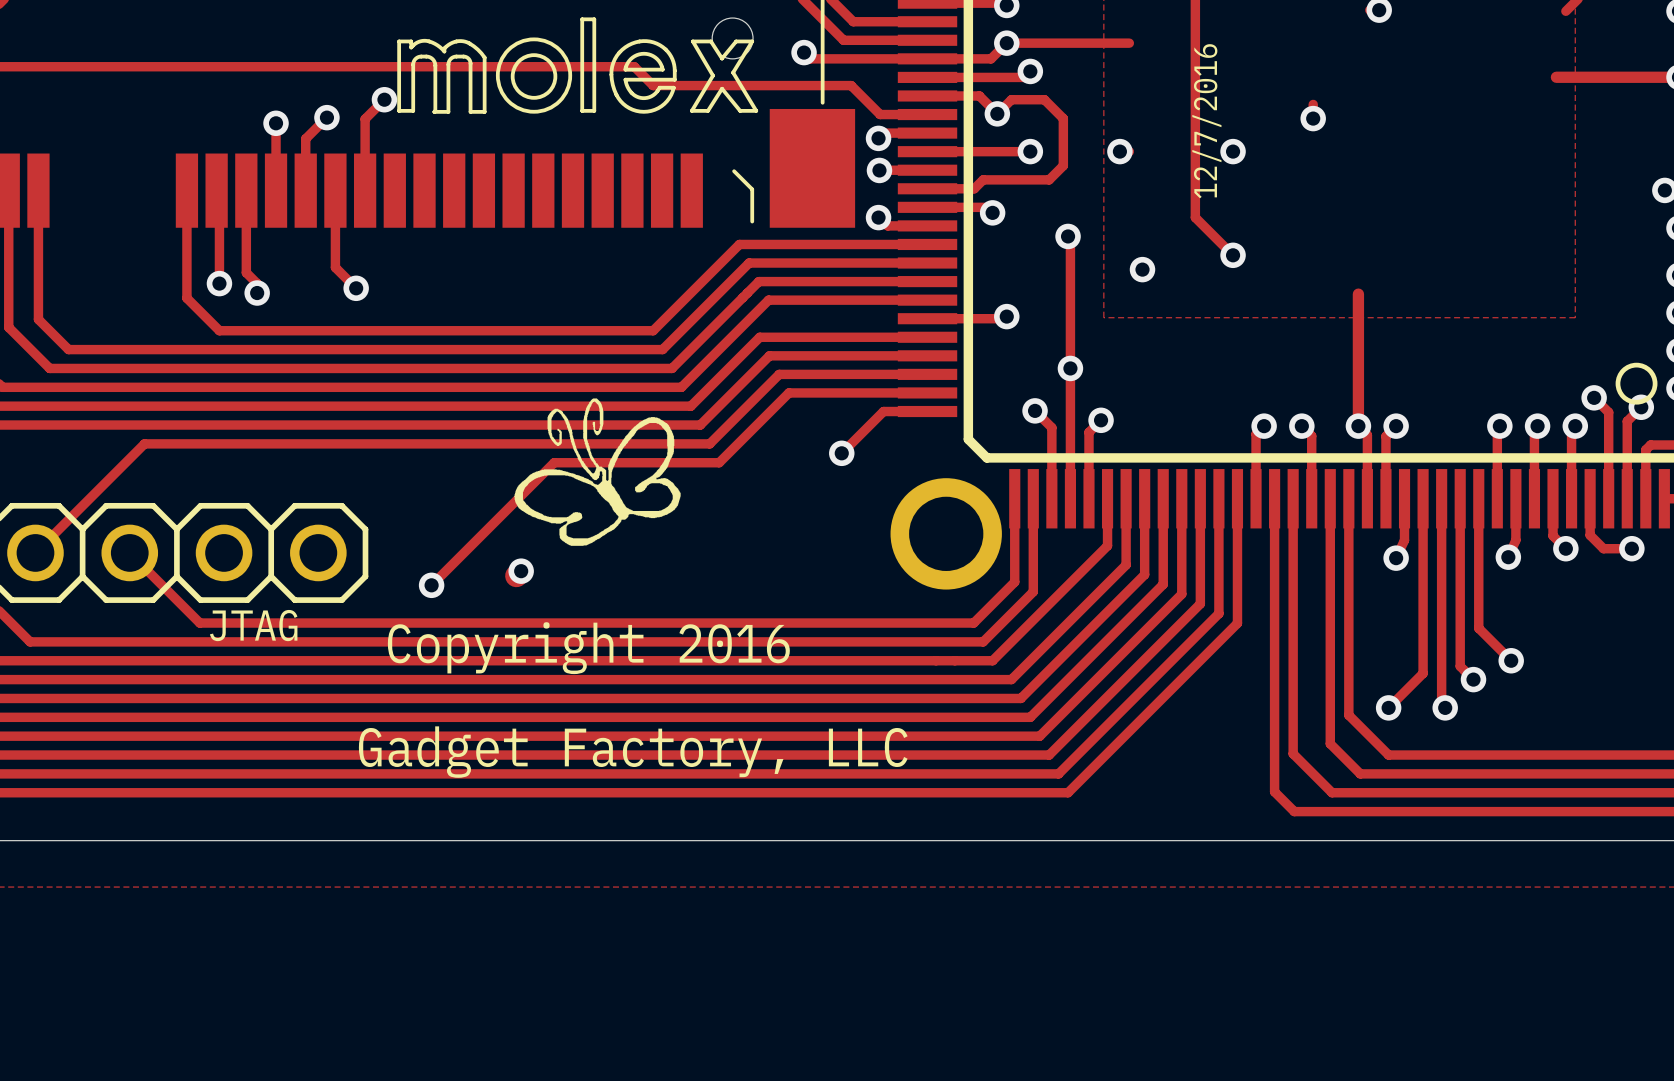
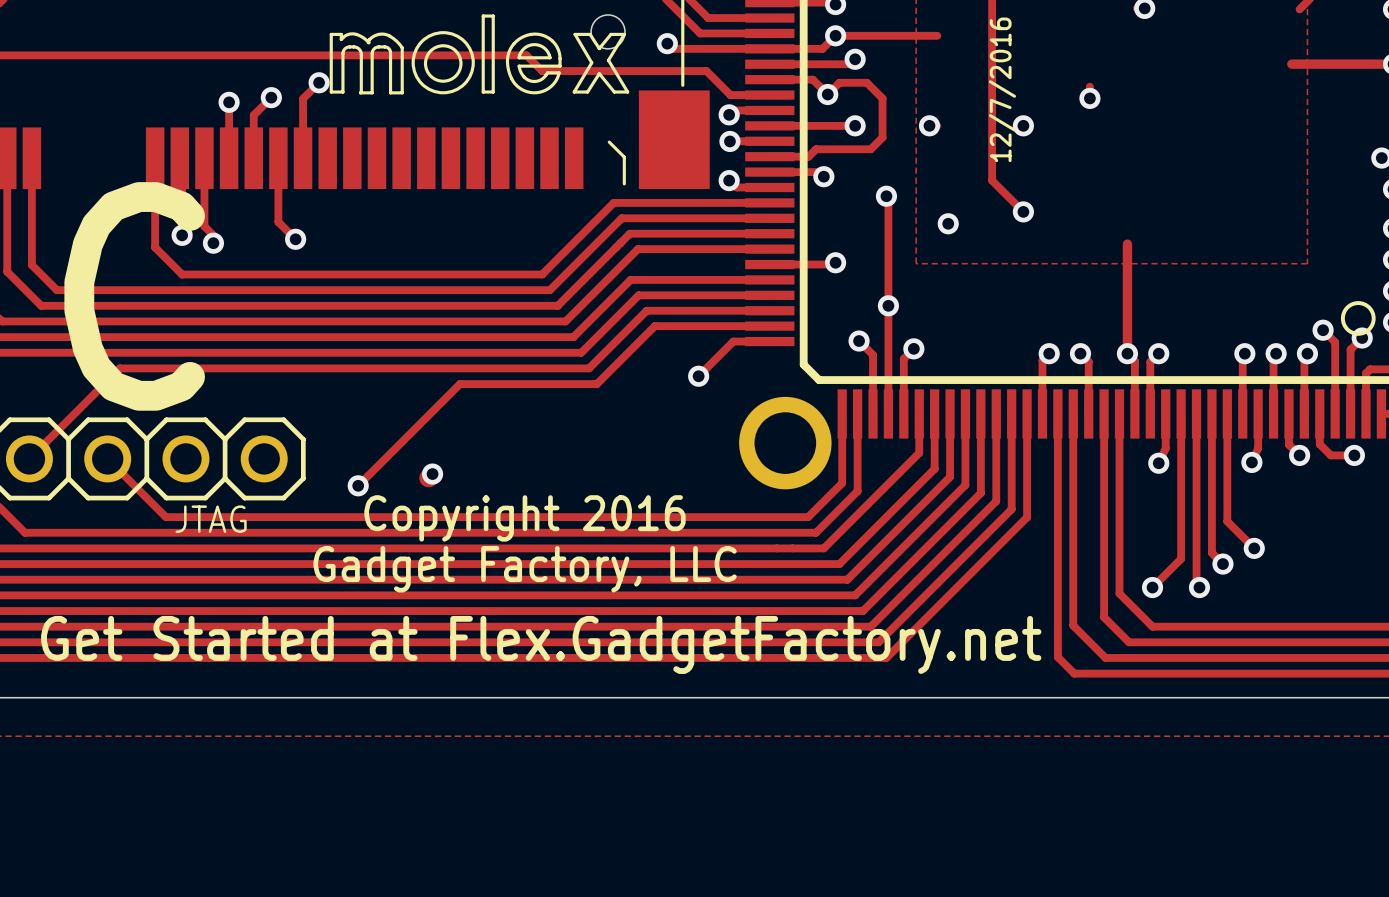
text: none -> C (134, 296)
drawing: [514, 398, 681, 546] -> none
text position: Copyright 2016 (588, 648) -> Copyright 2016 (524, 518)
text position: Gadget Factory, LLC (633, 752) -> Gadget Factory, LLC (525, 569)
text: none -> Get Started at Flex.GadgetFactory.net (541, 644)

